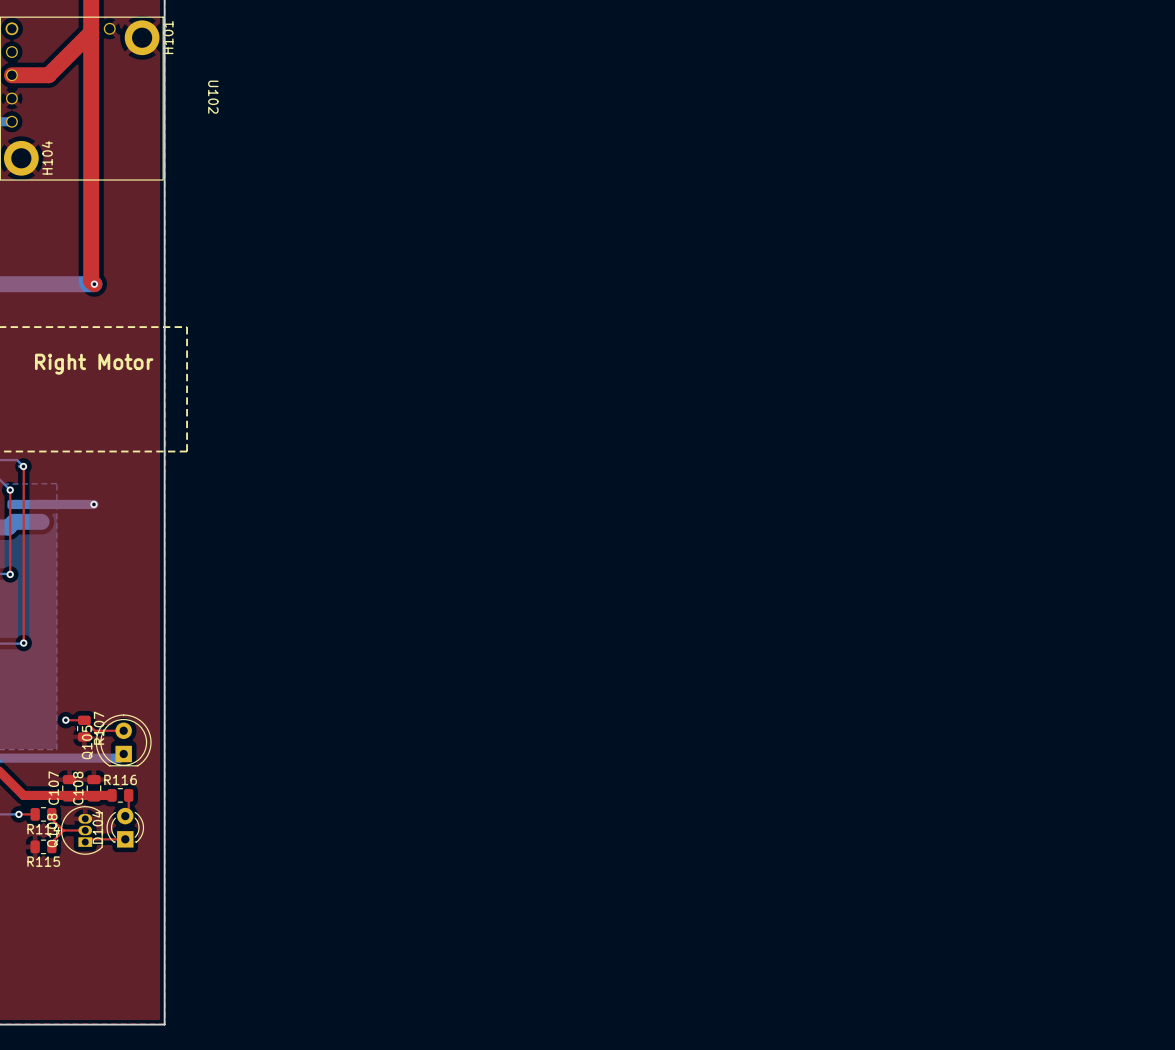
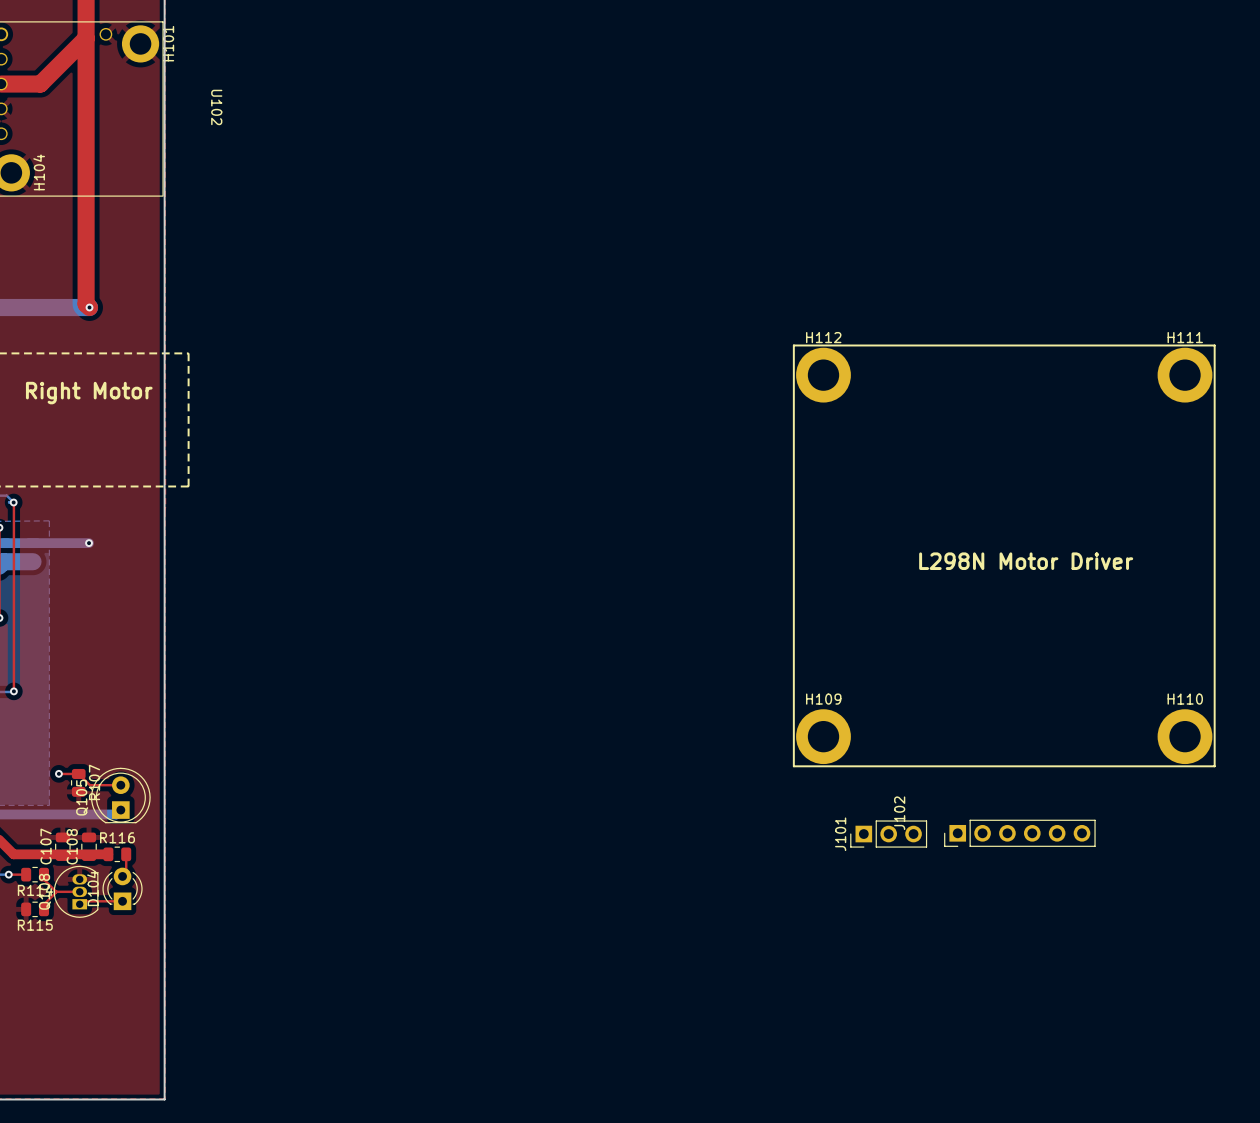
line: none -> (793, 345) (1214, 345) (1214, 766) (793, 766) (793, 345)
H112: none -> (823, 375)
H111: none -> (1185, 375)
text: none -> L298N Motor Driver (1026, 561)
H109: none -> (823, 736)
H110: none -> (1185, 736)
J102: none -> (1019, 833)
J101: none -> (888, 834)

